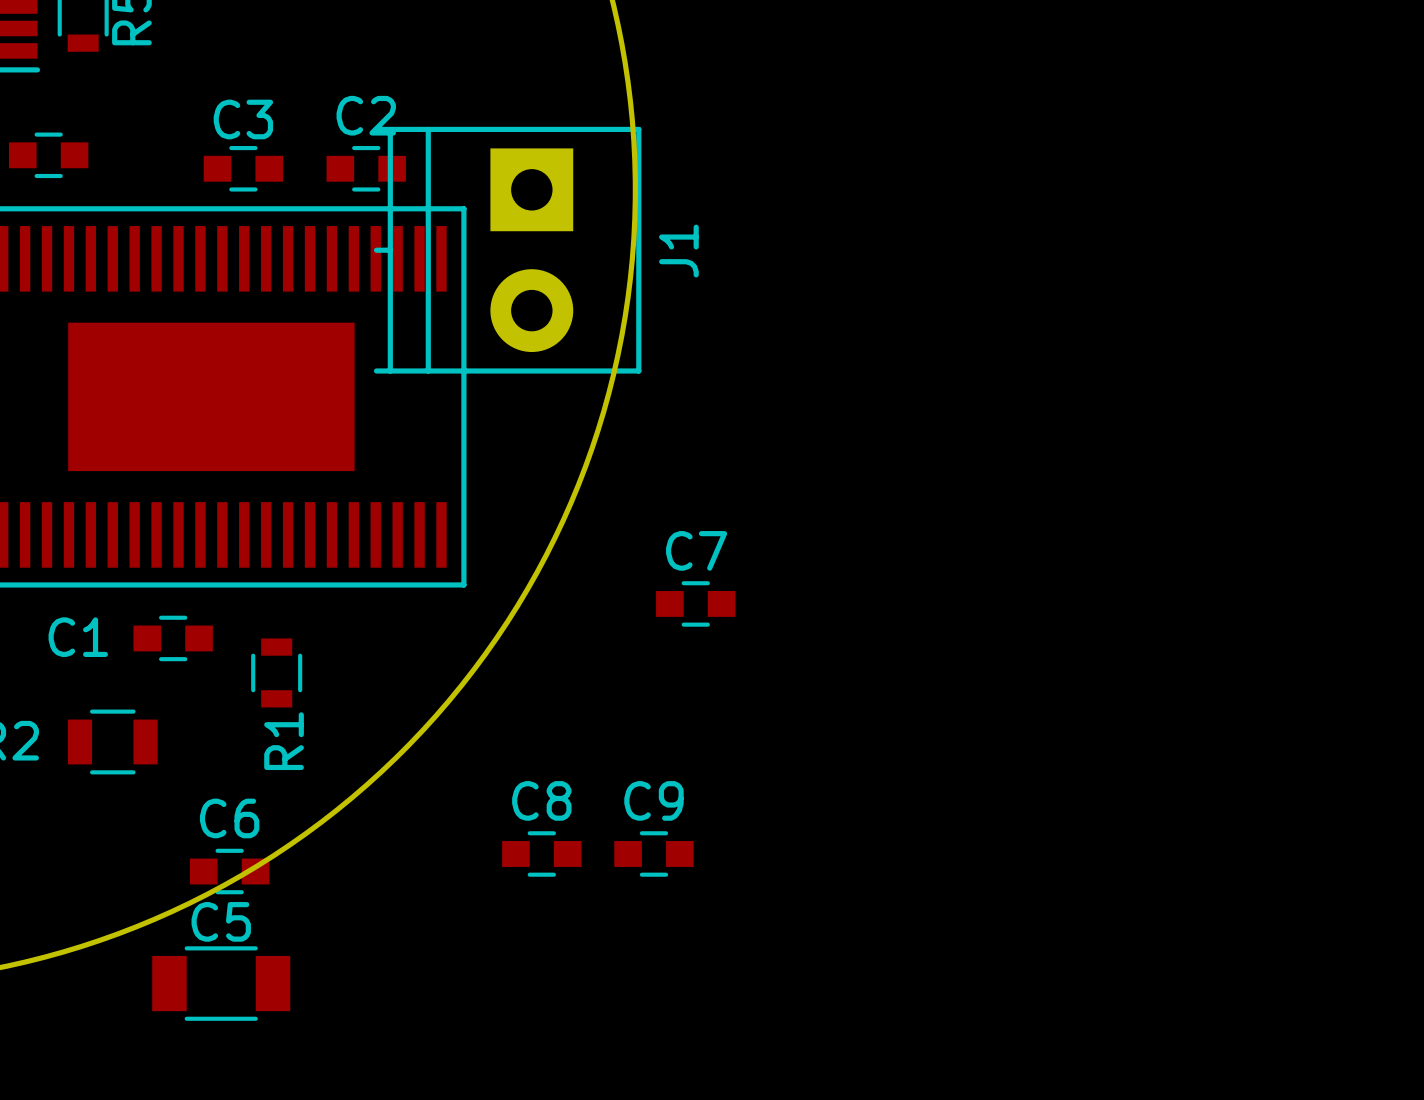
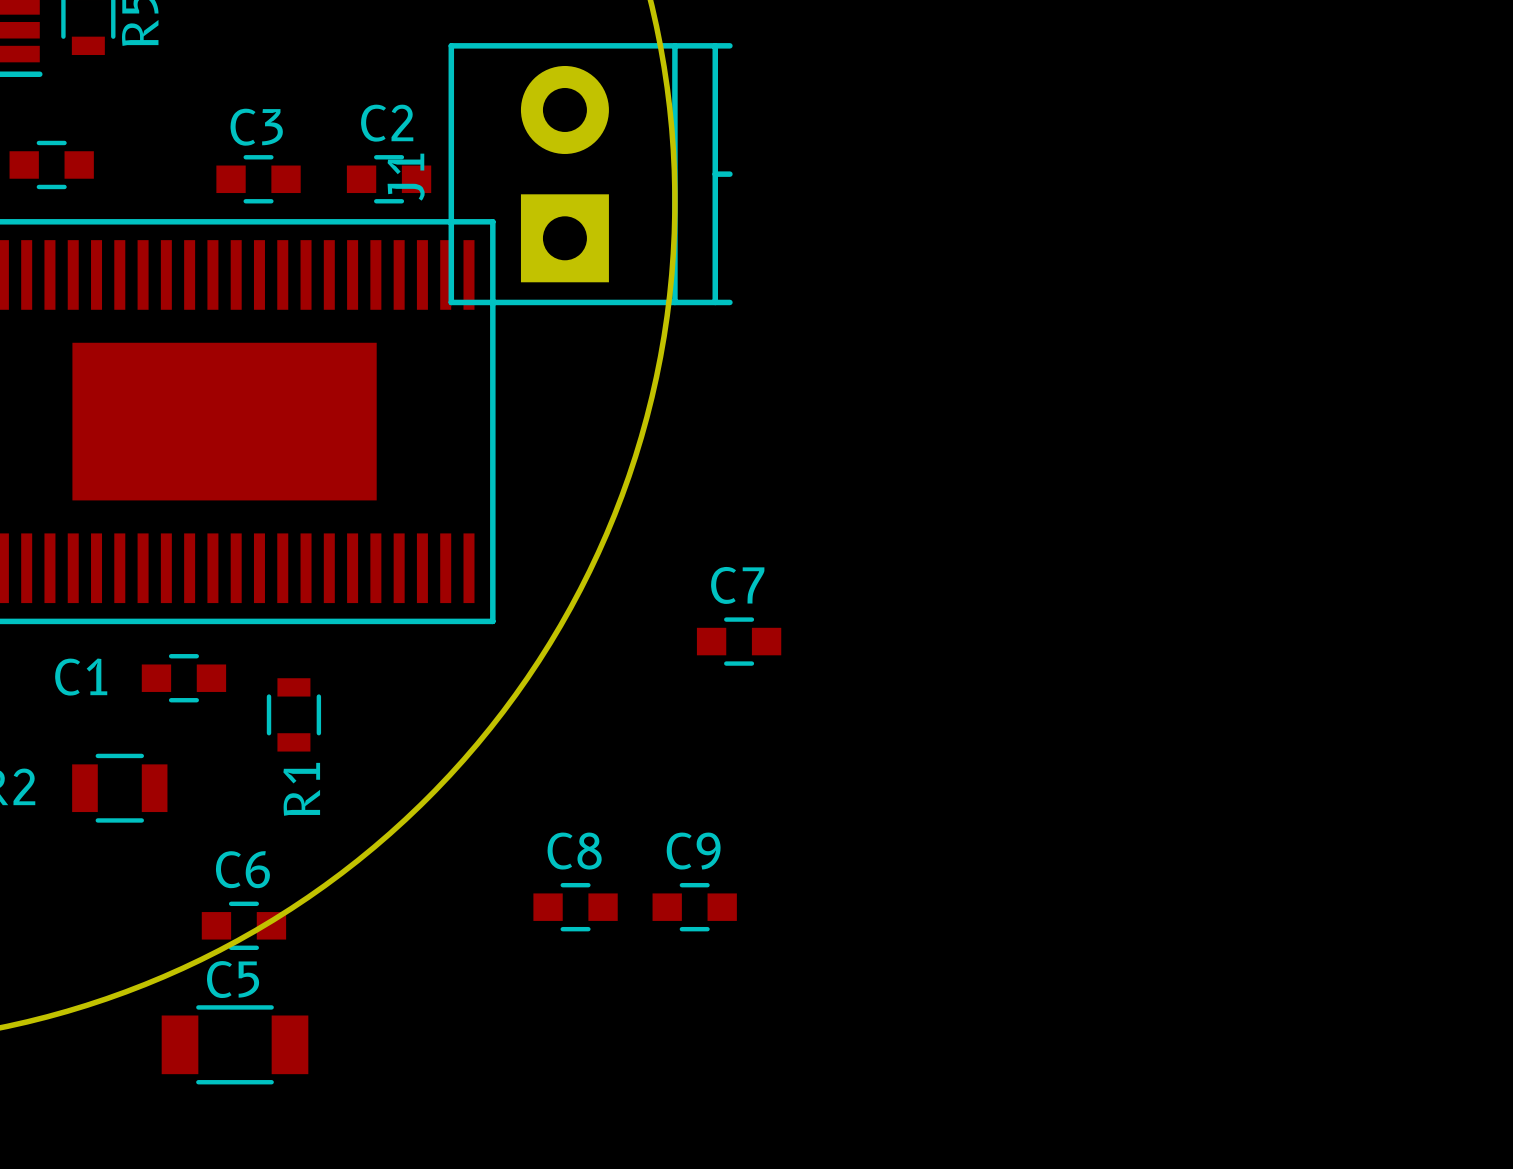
J1 rotation: 0° (507, 250) -> 180° (590, 174)

